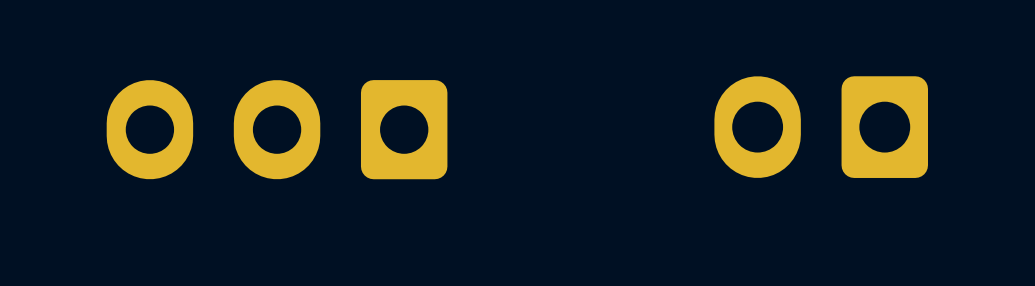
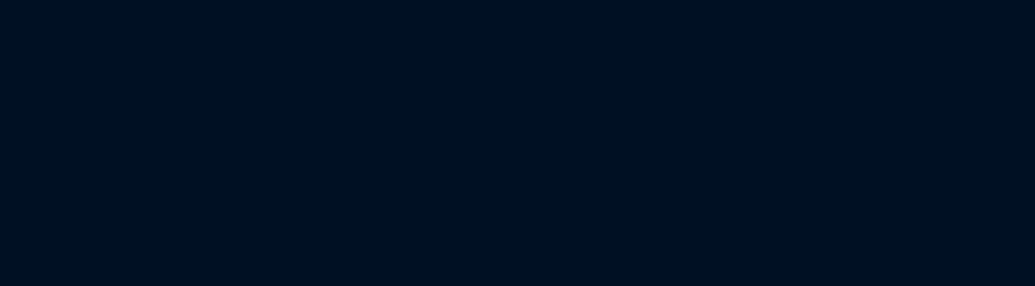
part: (821, 127) -> none
part: (277, 129) -> none

